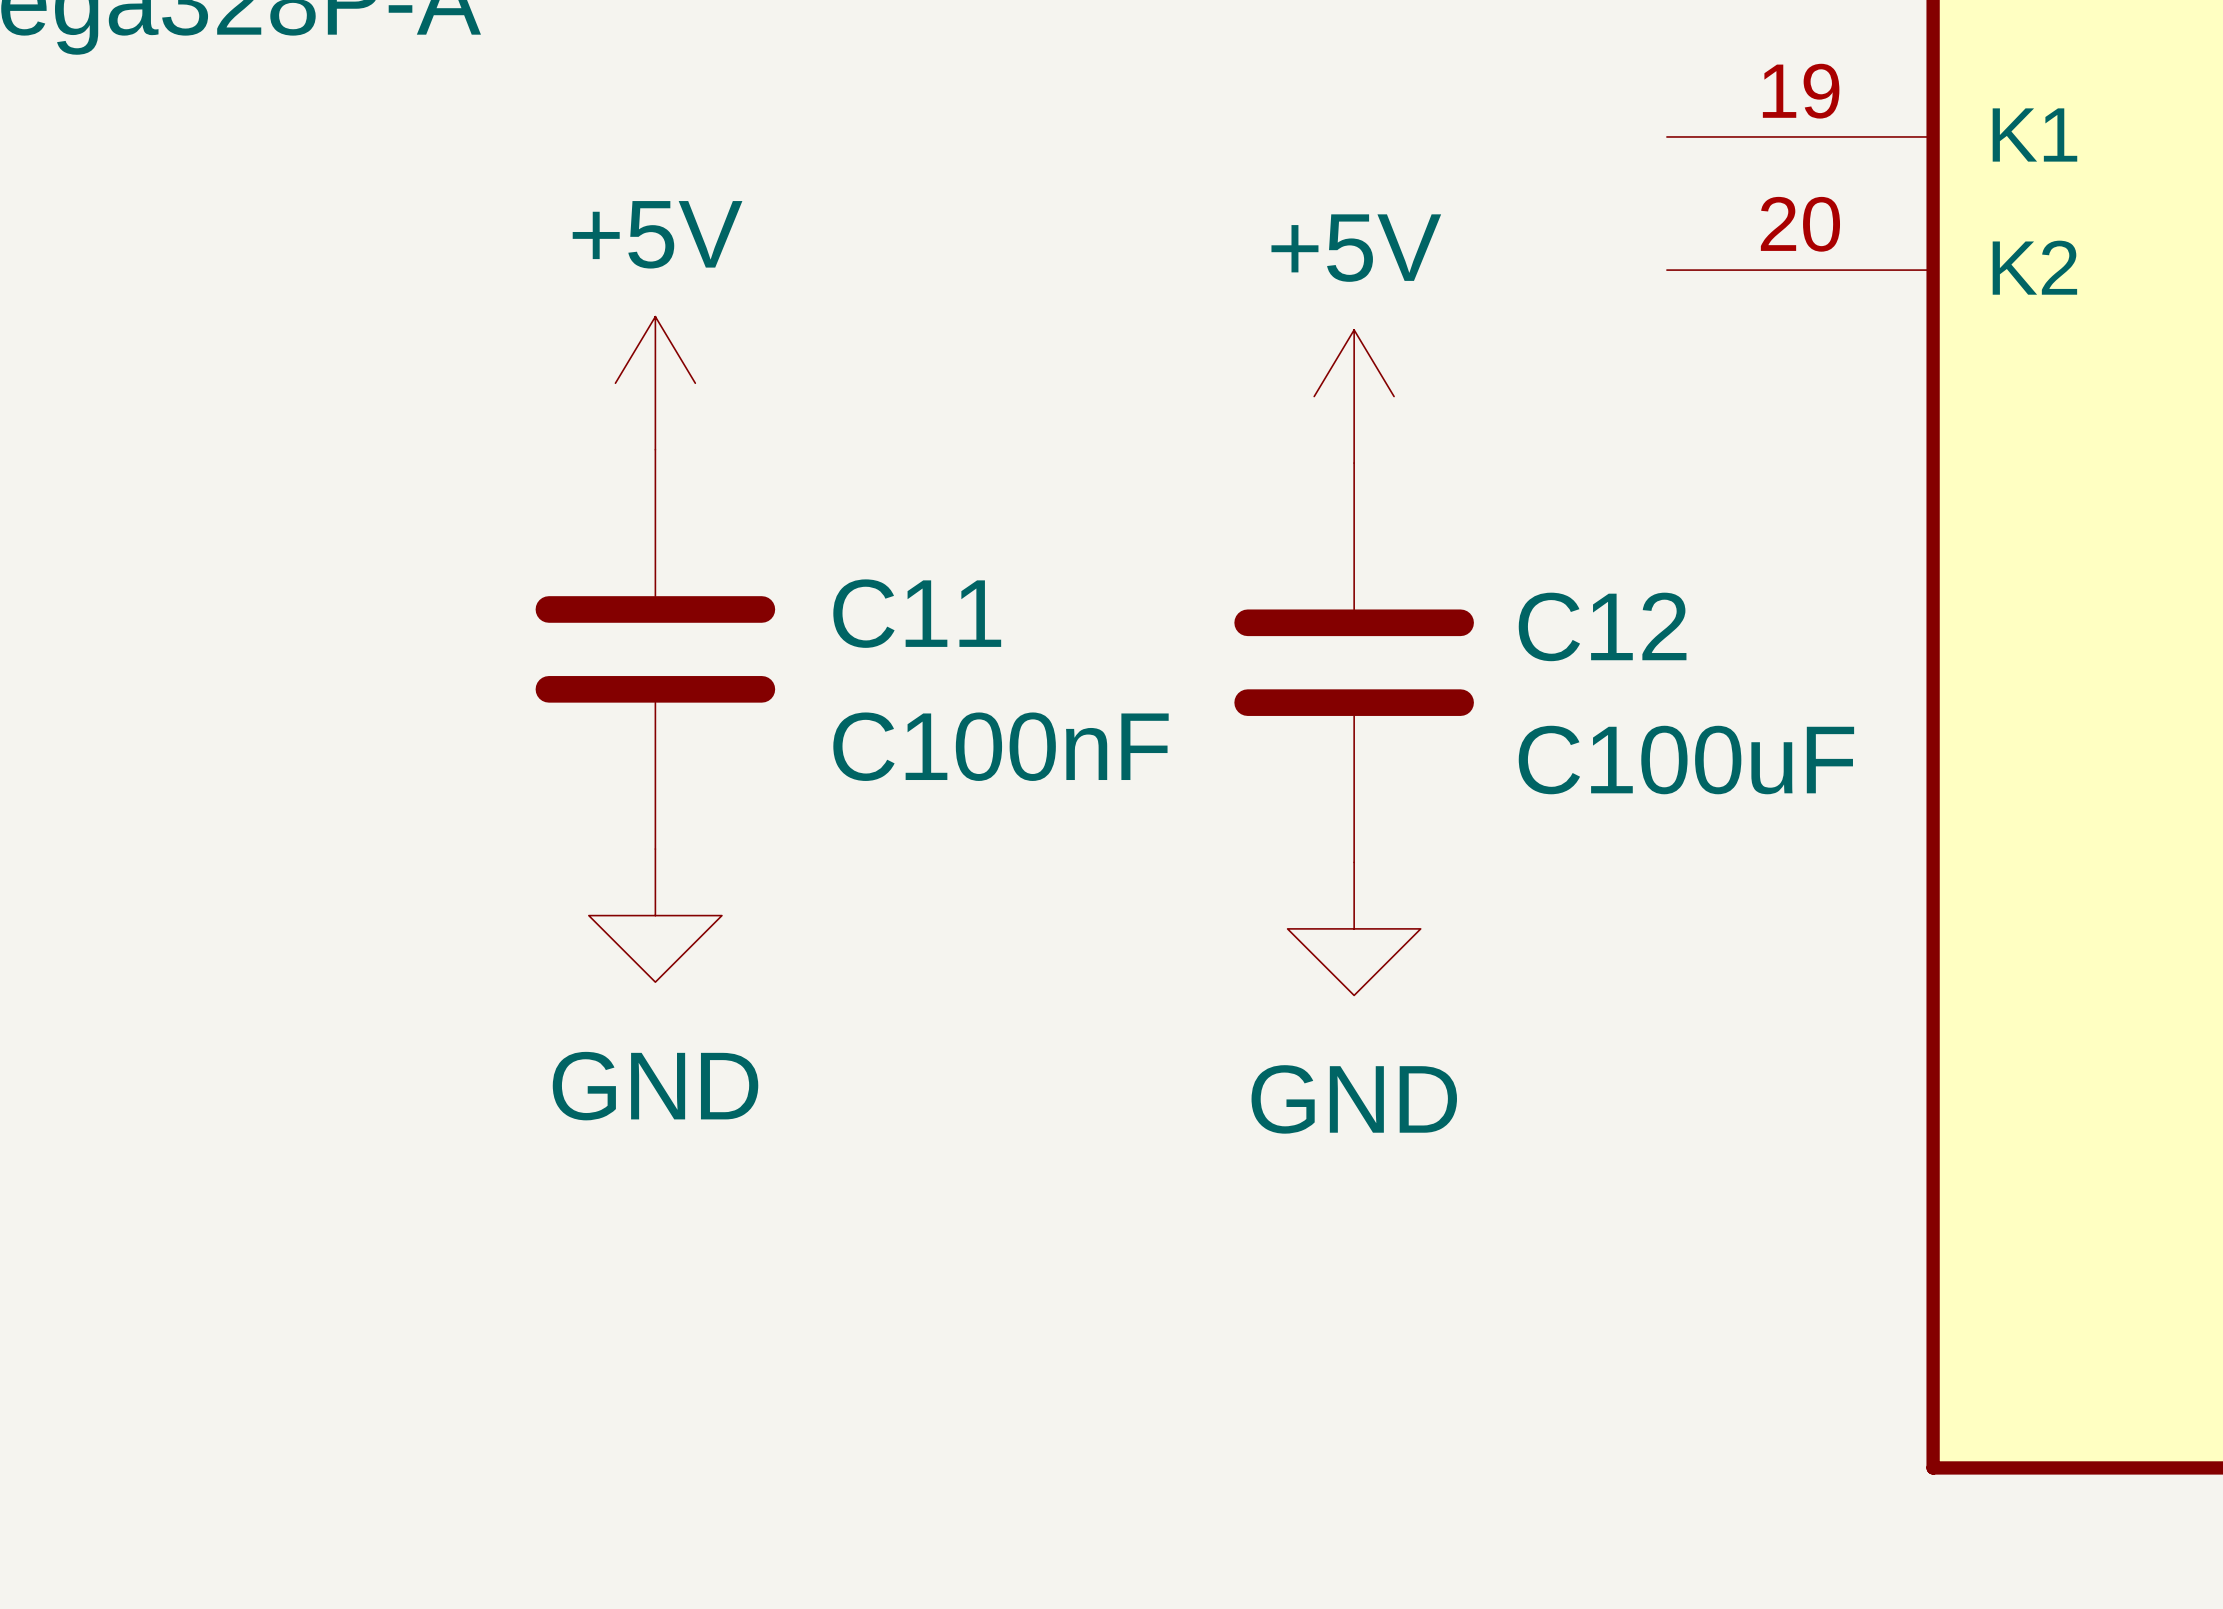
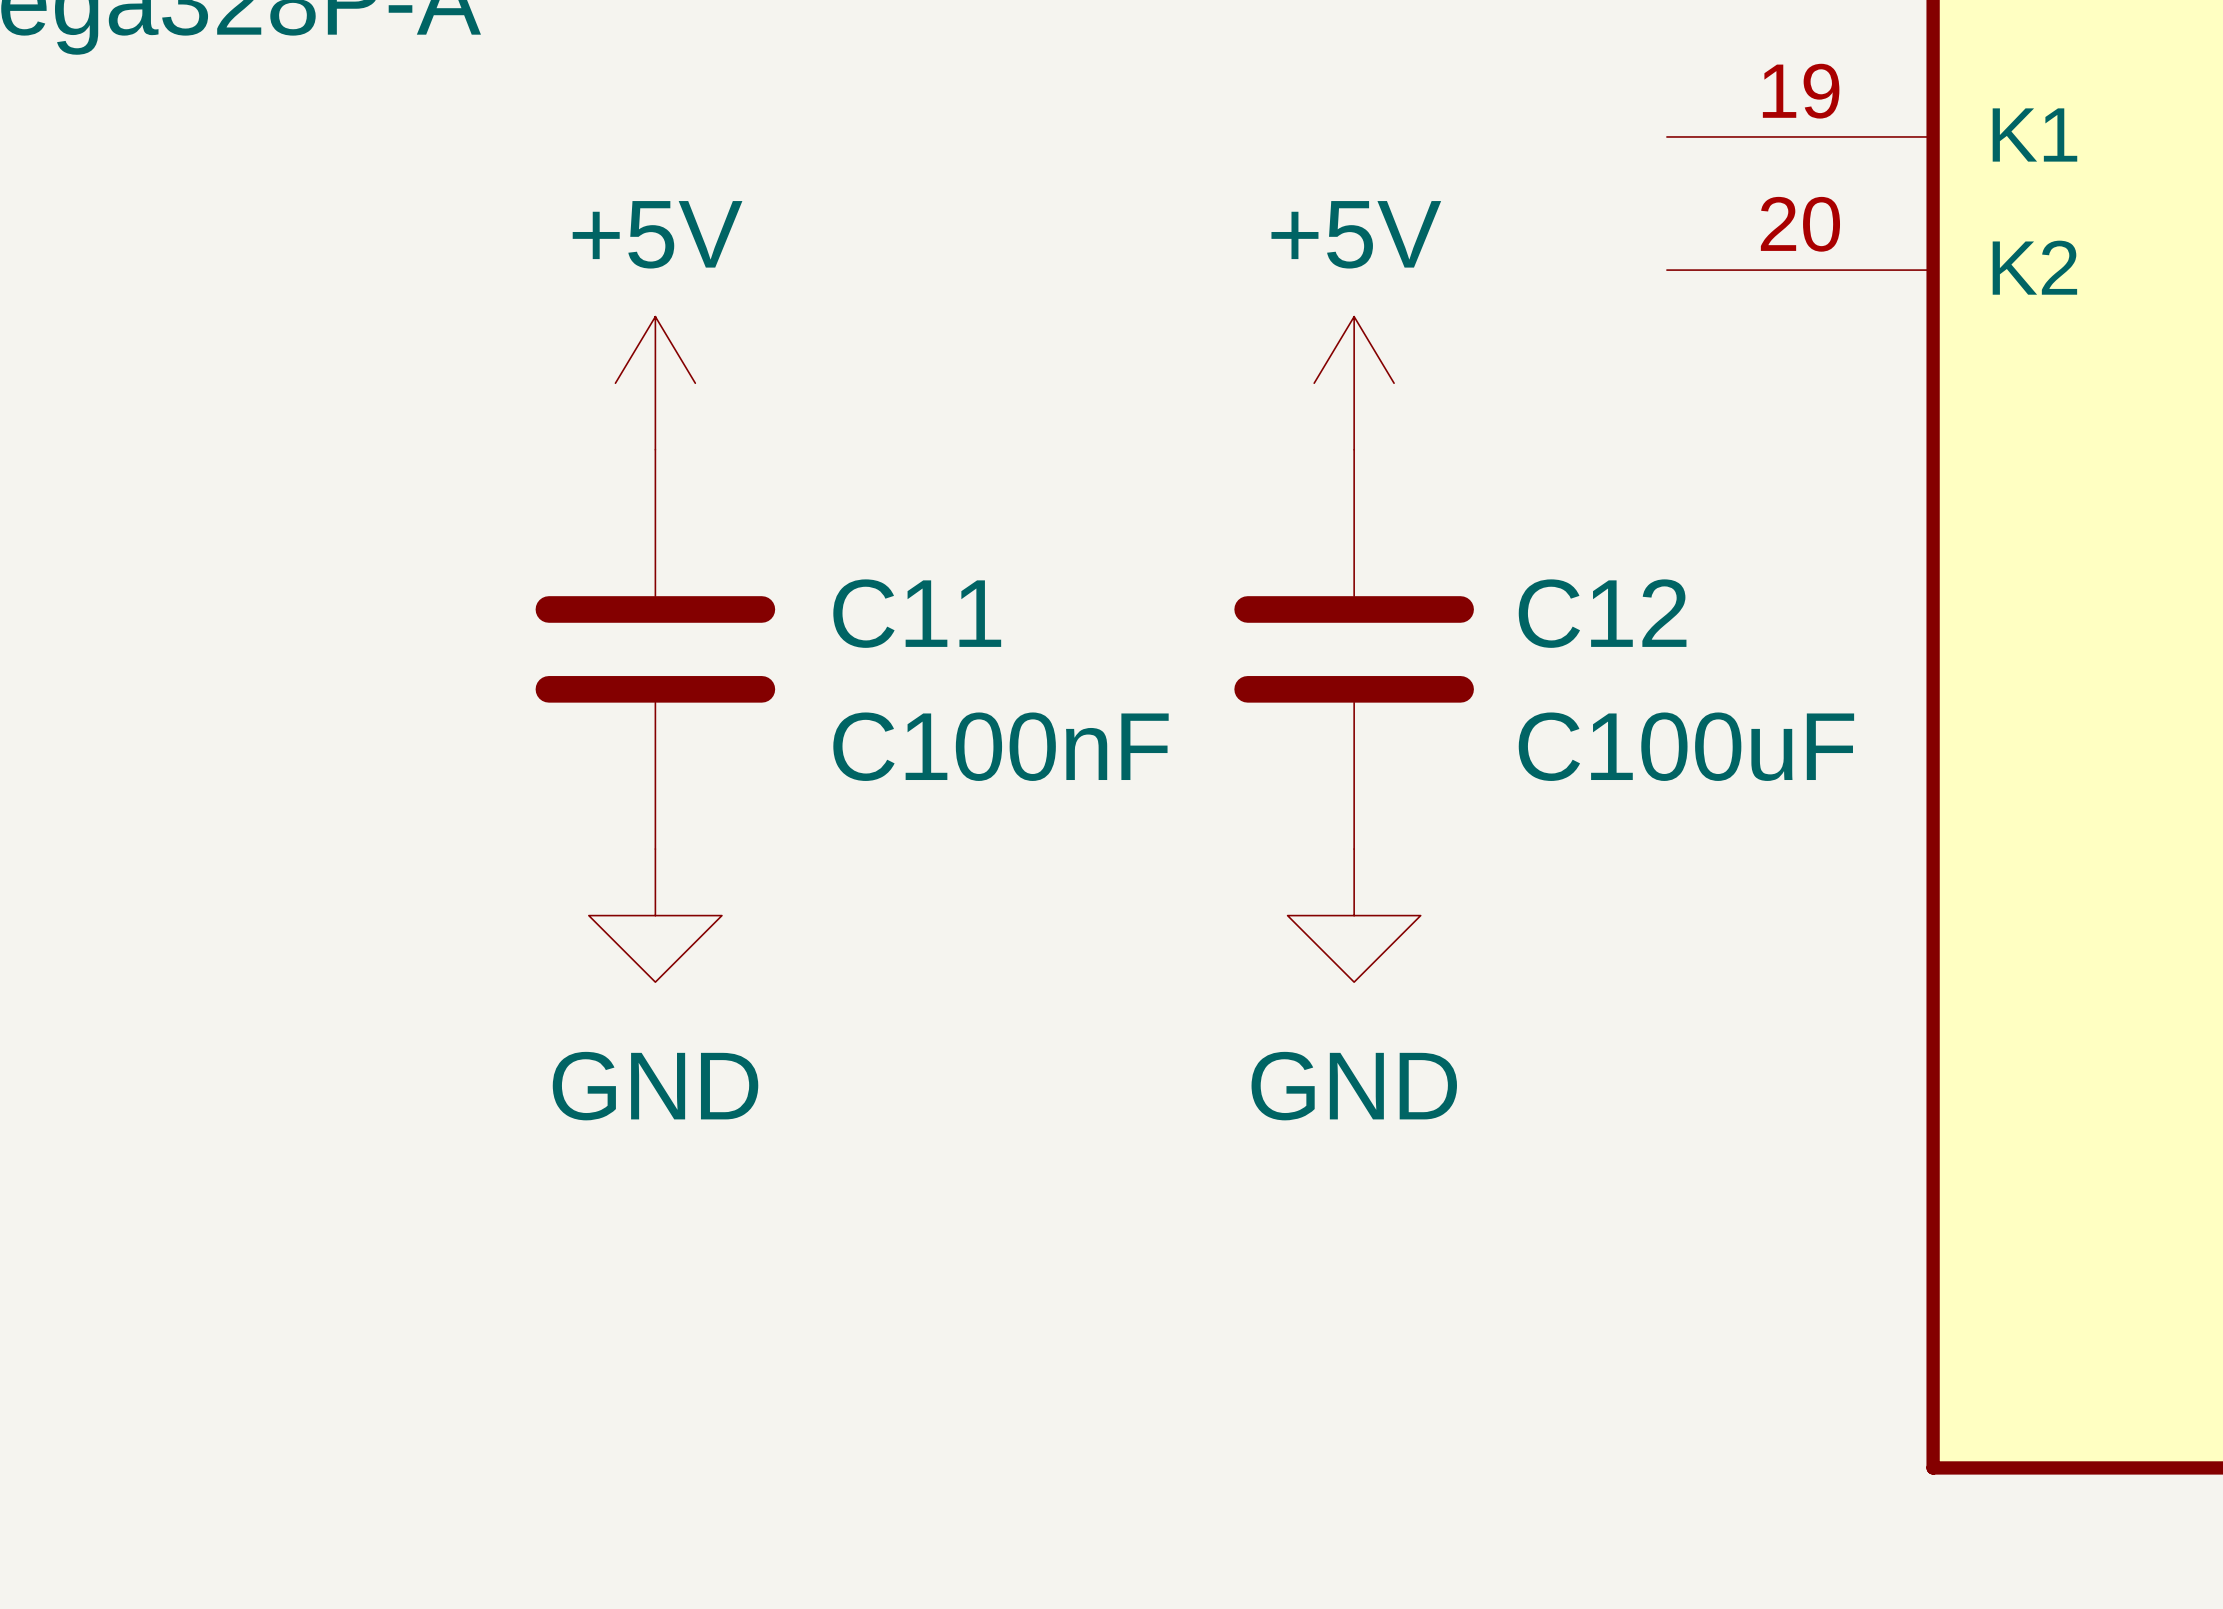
power symbol position: +5V (1354, 396) -> +5V (1354, 383)
C12 position: (1354, 662) -> (1354, 649)
power symbol position: GND (1354, 928) -> GND (1354, 915)

